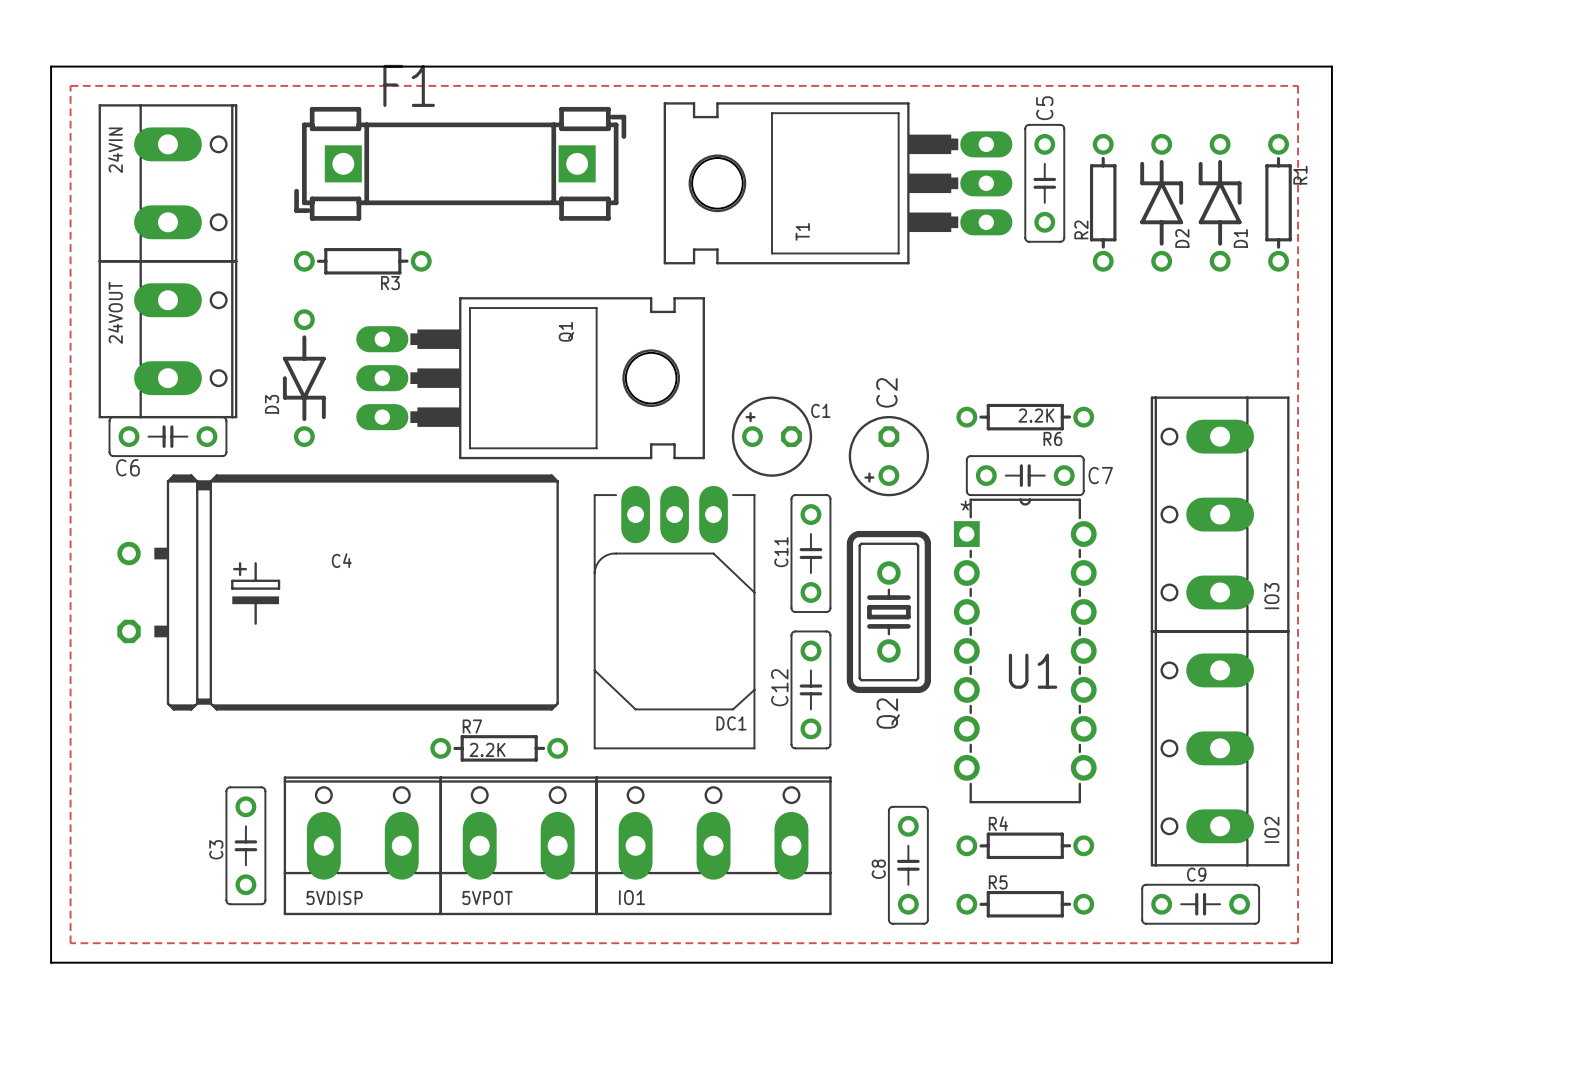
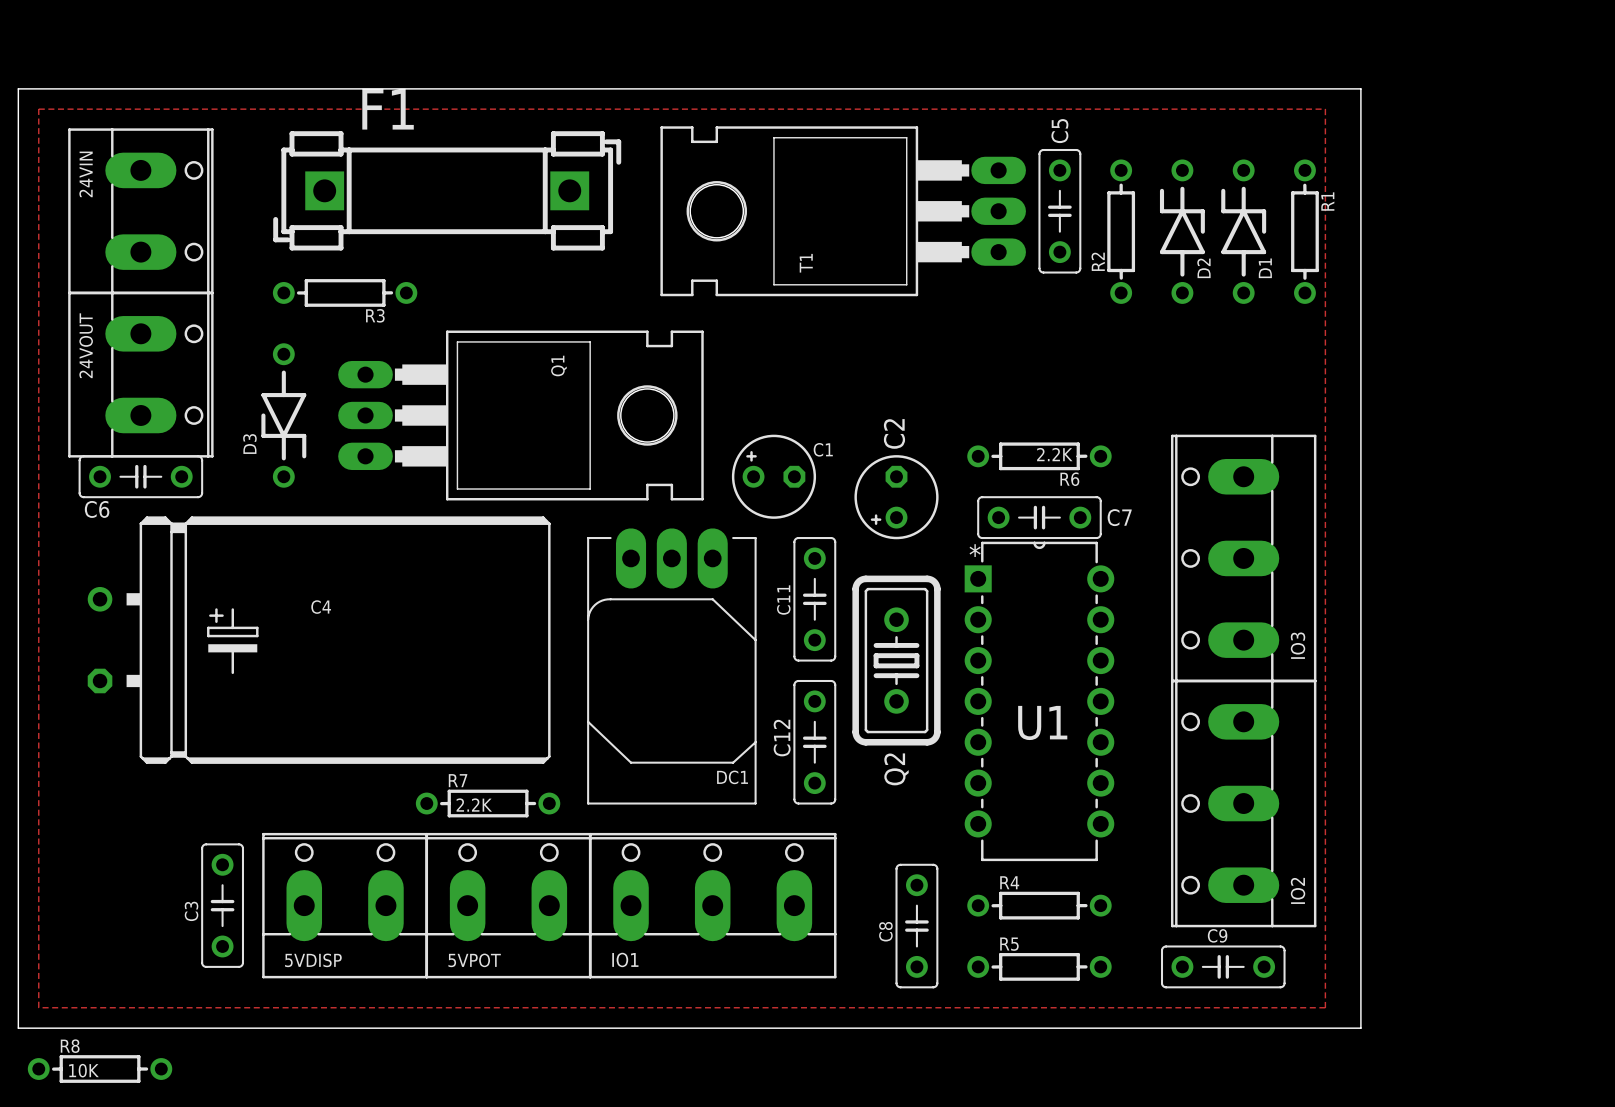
R8: none -> 10K (100, 1069)

